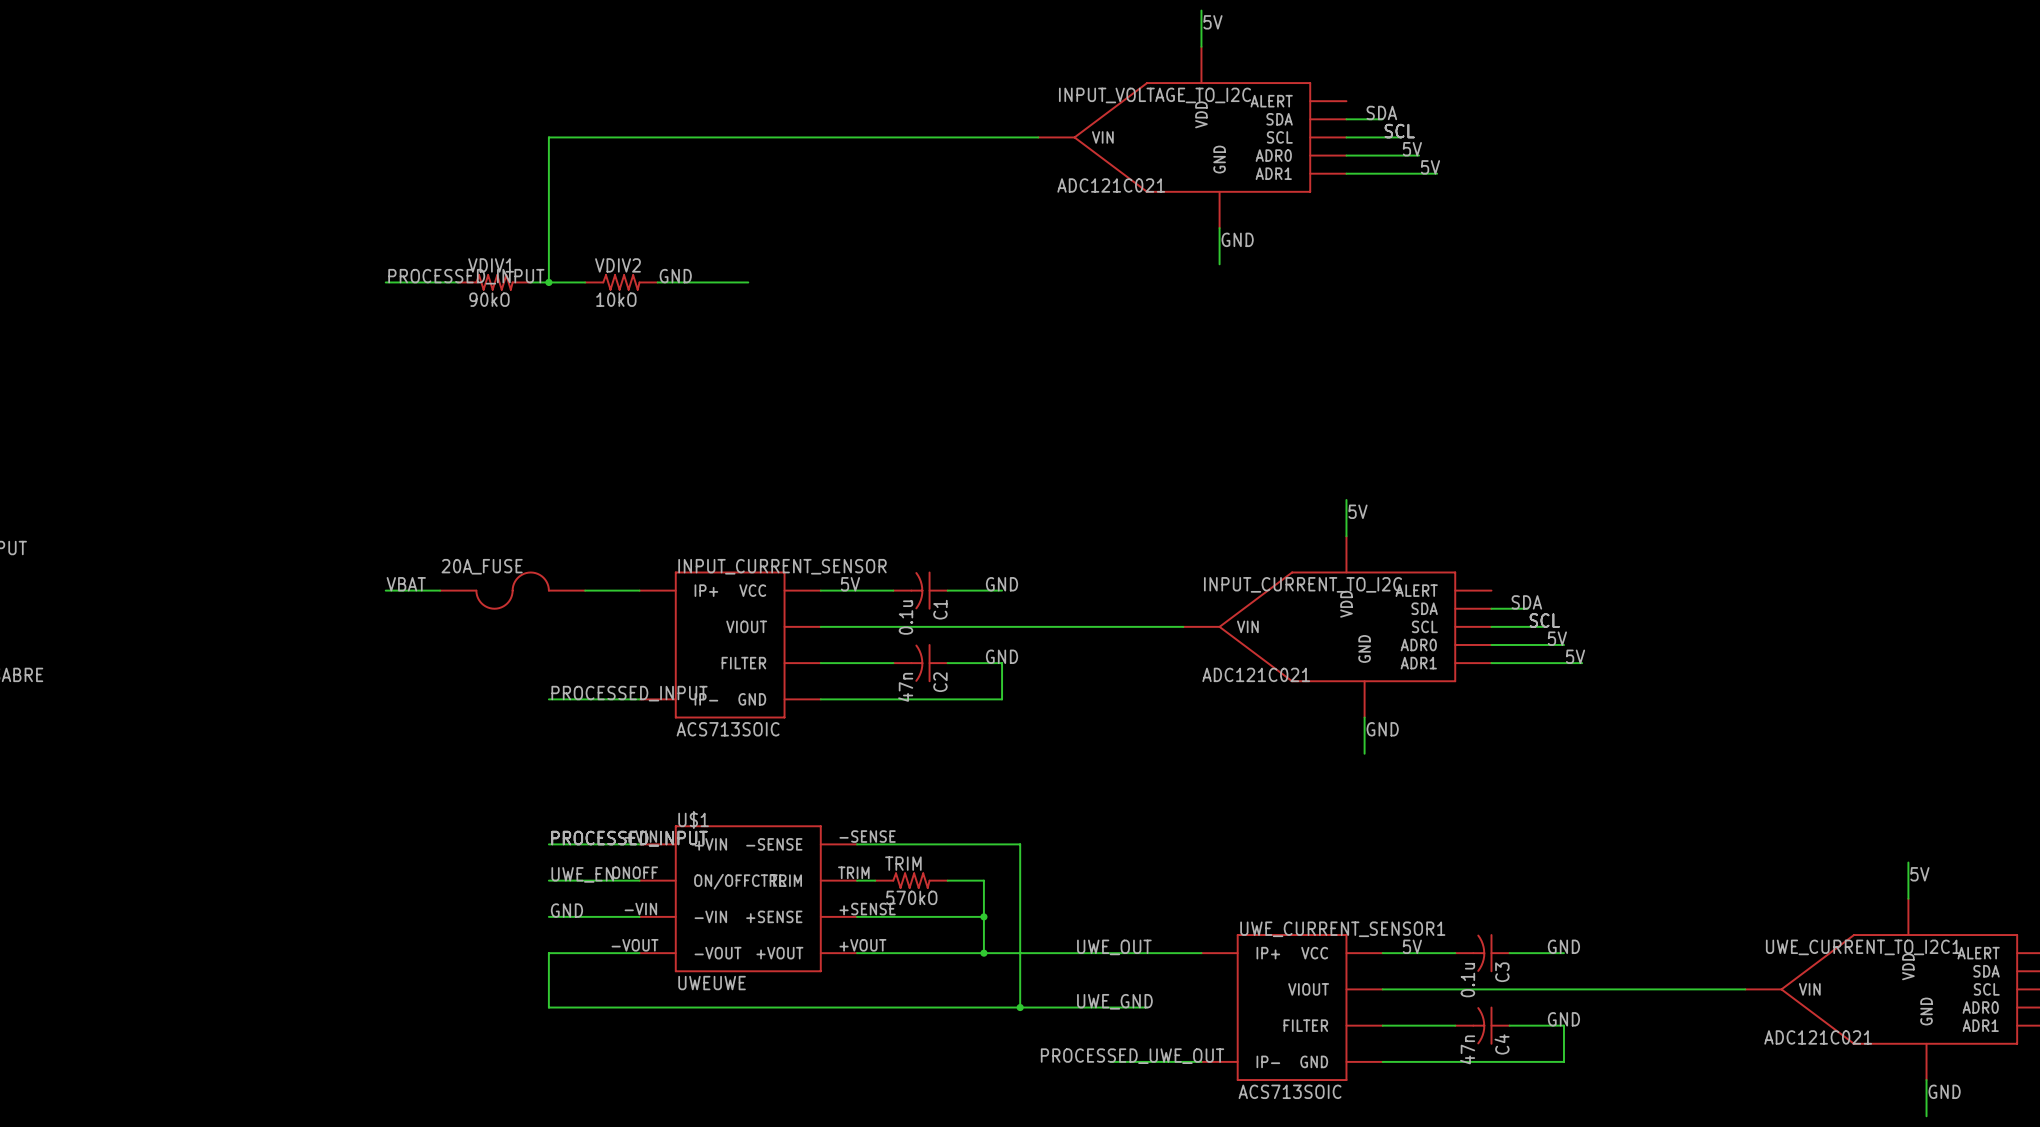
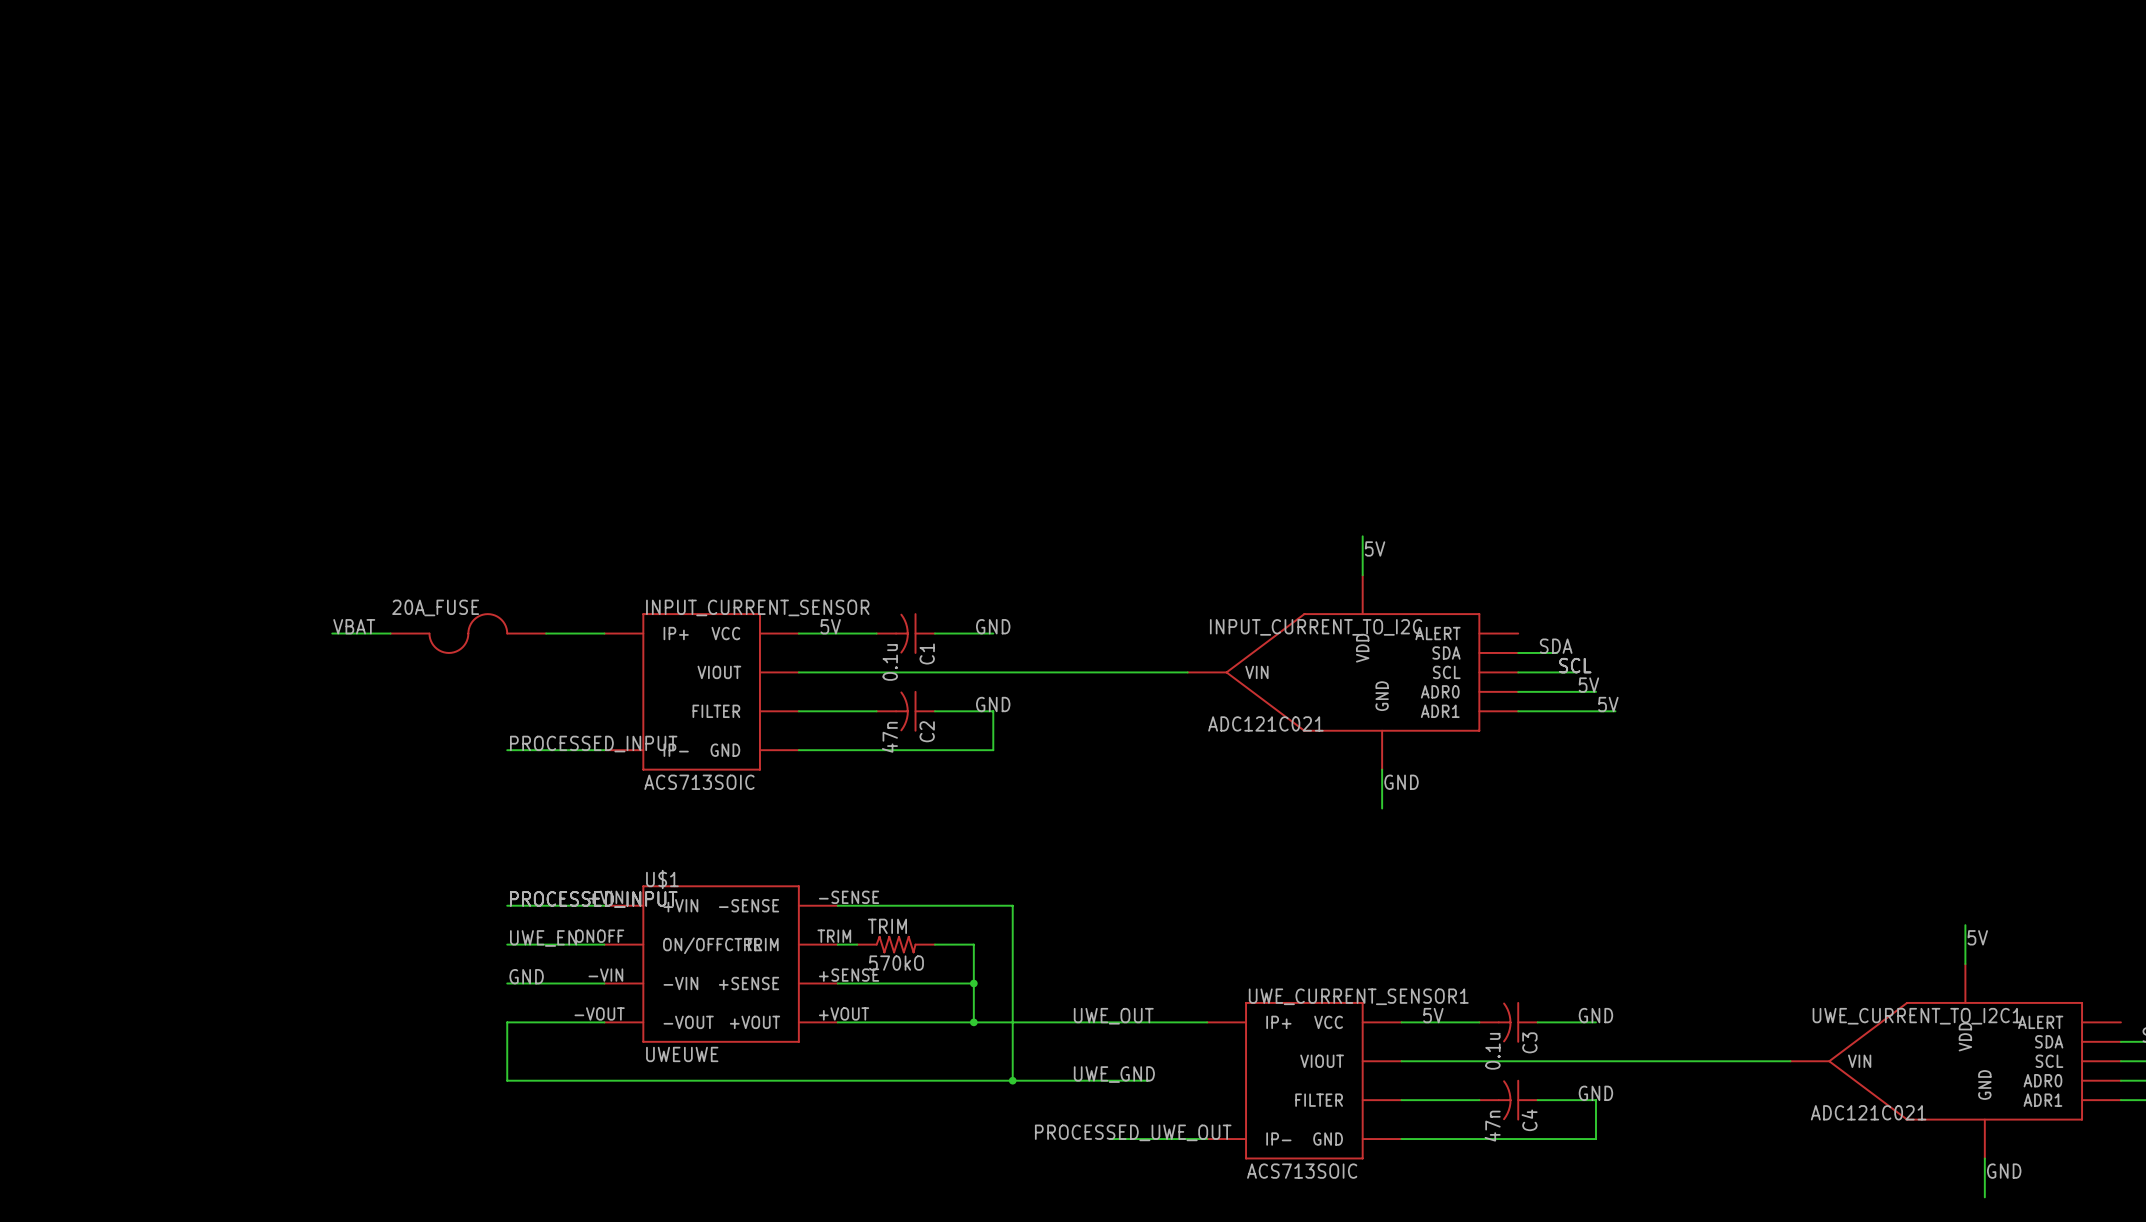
wire: (1201, 10) (1201, 46) -> none
label: 5V (1213, 22) -> none
label: SDA (1381, 112) -> none
wire: (1346, 119) (1382, 119) -> none
label: SCL (1399, 131) -> none
wire: (1038, 137) (548, 137) (548, 282) -> none
INPUT_VOLTAGE_TO_I2C: ADC121C021 (1192, 137) -> none
wire: (1346, 137) (1400, 137) -> none
label: 5V (1412, 149) -> none
wire: (1346, 155) (1418, 155) -> none
label: 5V (1430, 167) -> none
wire: (1346, 173) (1437, 173) -> none
wire: (1219, 228) (1219, 264) -> none
label: GND (1237, 239) -> none
label: PROCESSED_INPUT (466, 276) -> none
label: GND (675, 276) -> none
wire: (385, 282) (458, 282) -> none
VDIV1: 90kO (494, 282) -> none
wire: (530, 282) (585, 282) -> none
junction: (548, 282) -> none
VDIV2: 10kO (621, 282) -> none
wire: (657, 282) (748, 282) -> none

